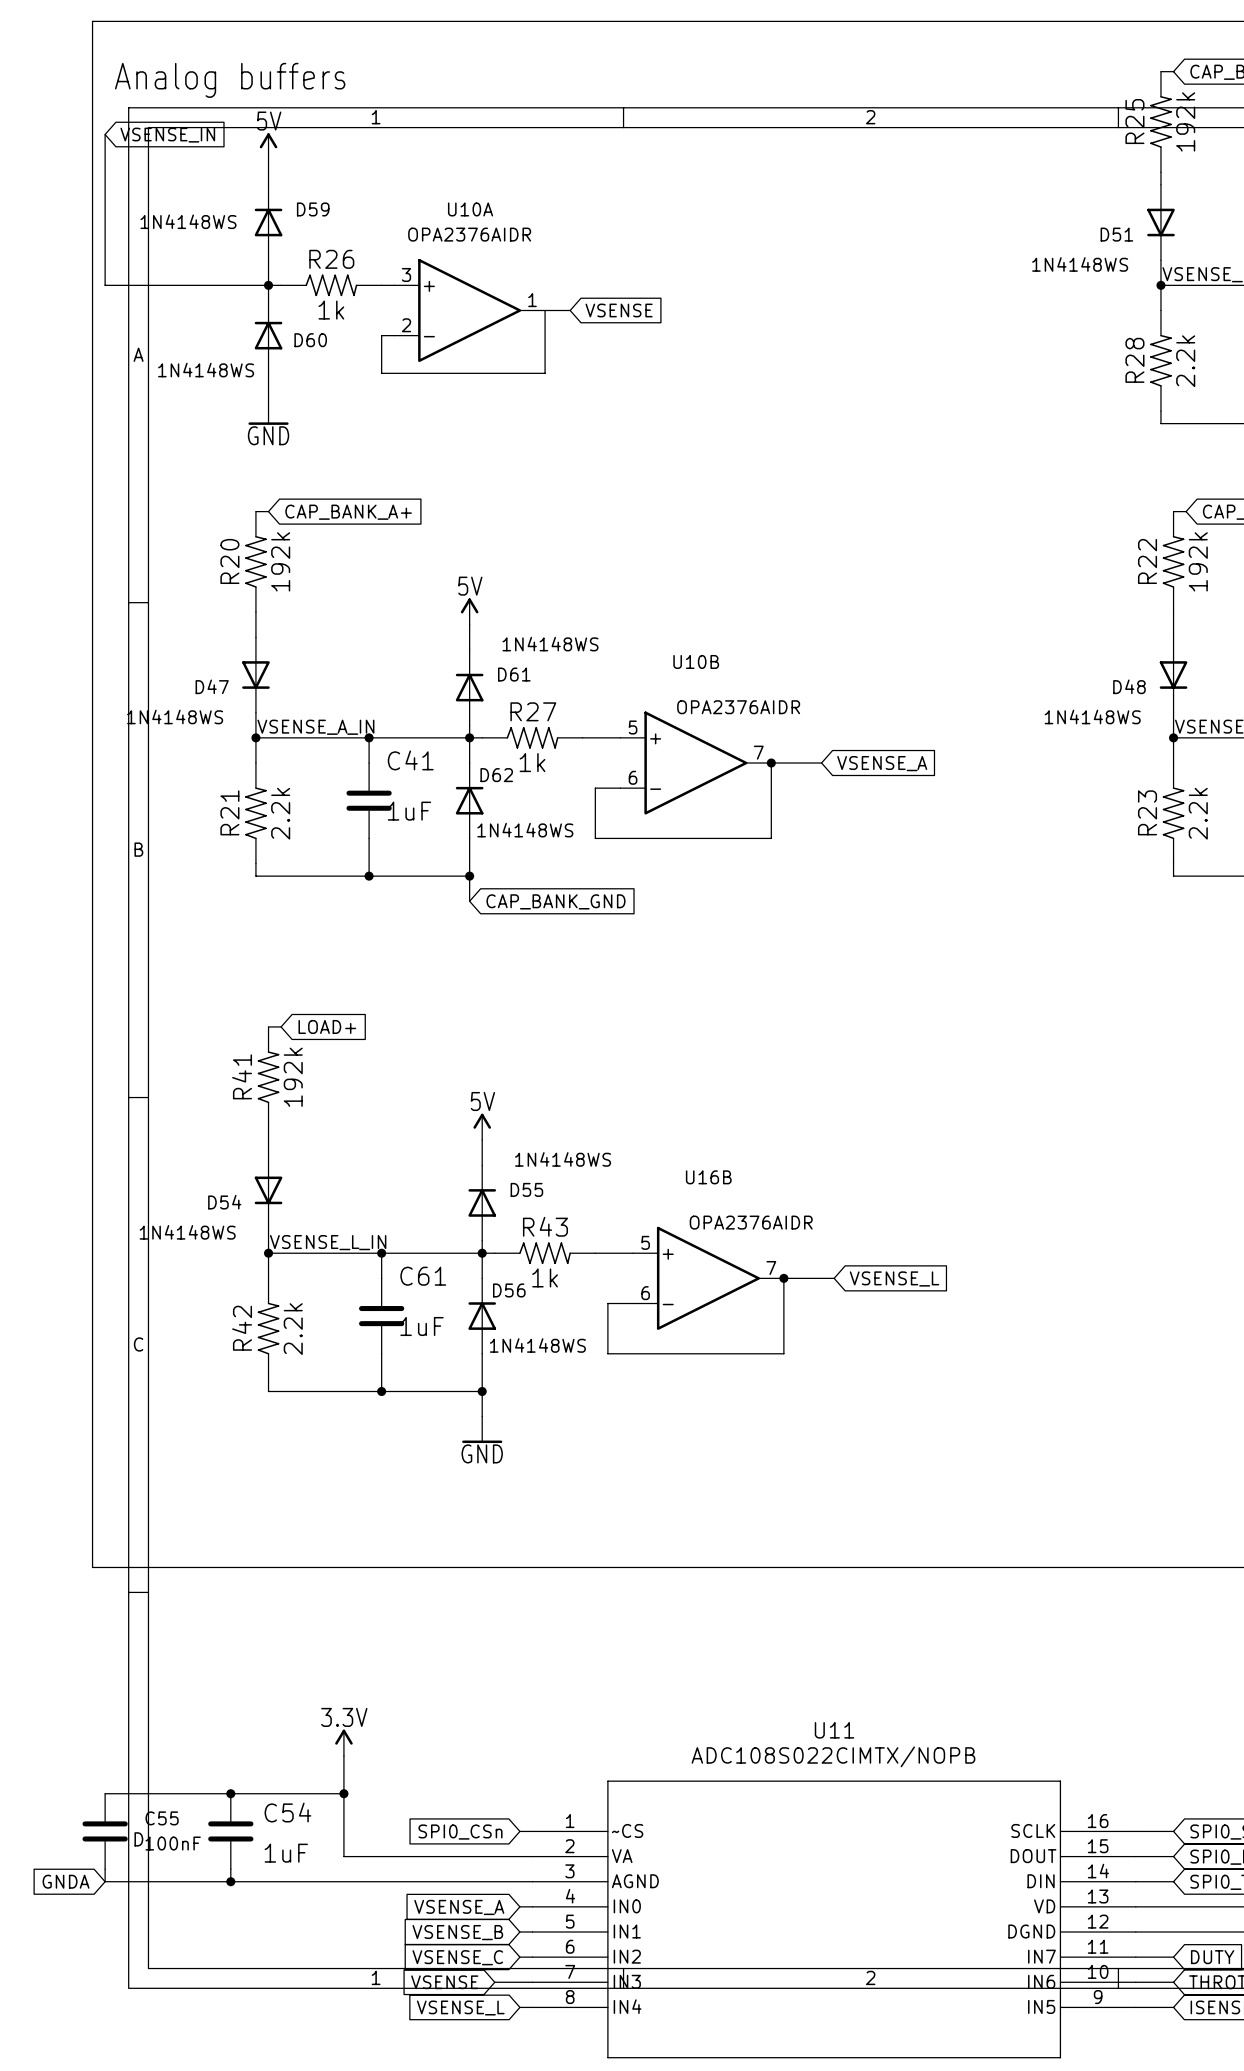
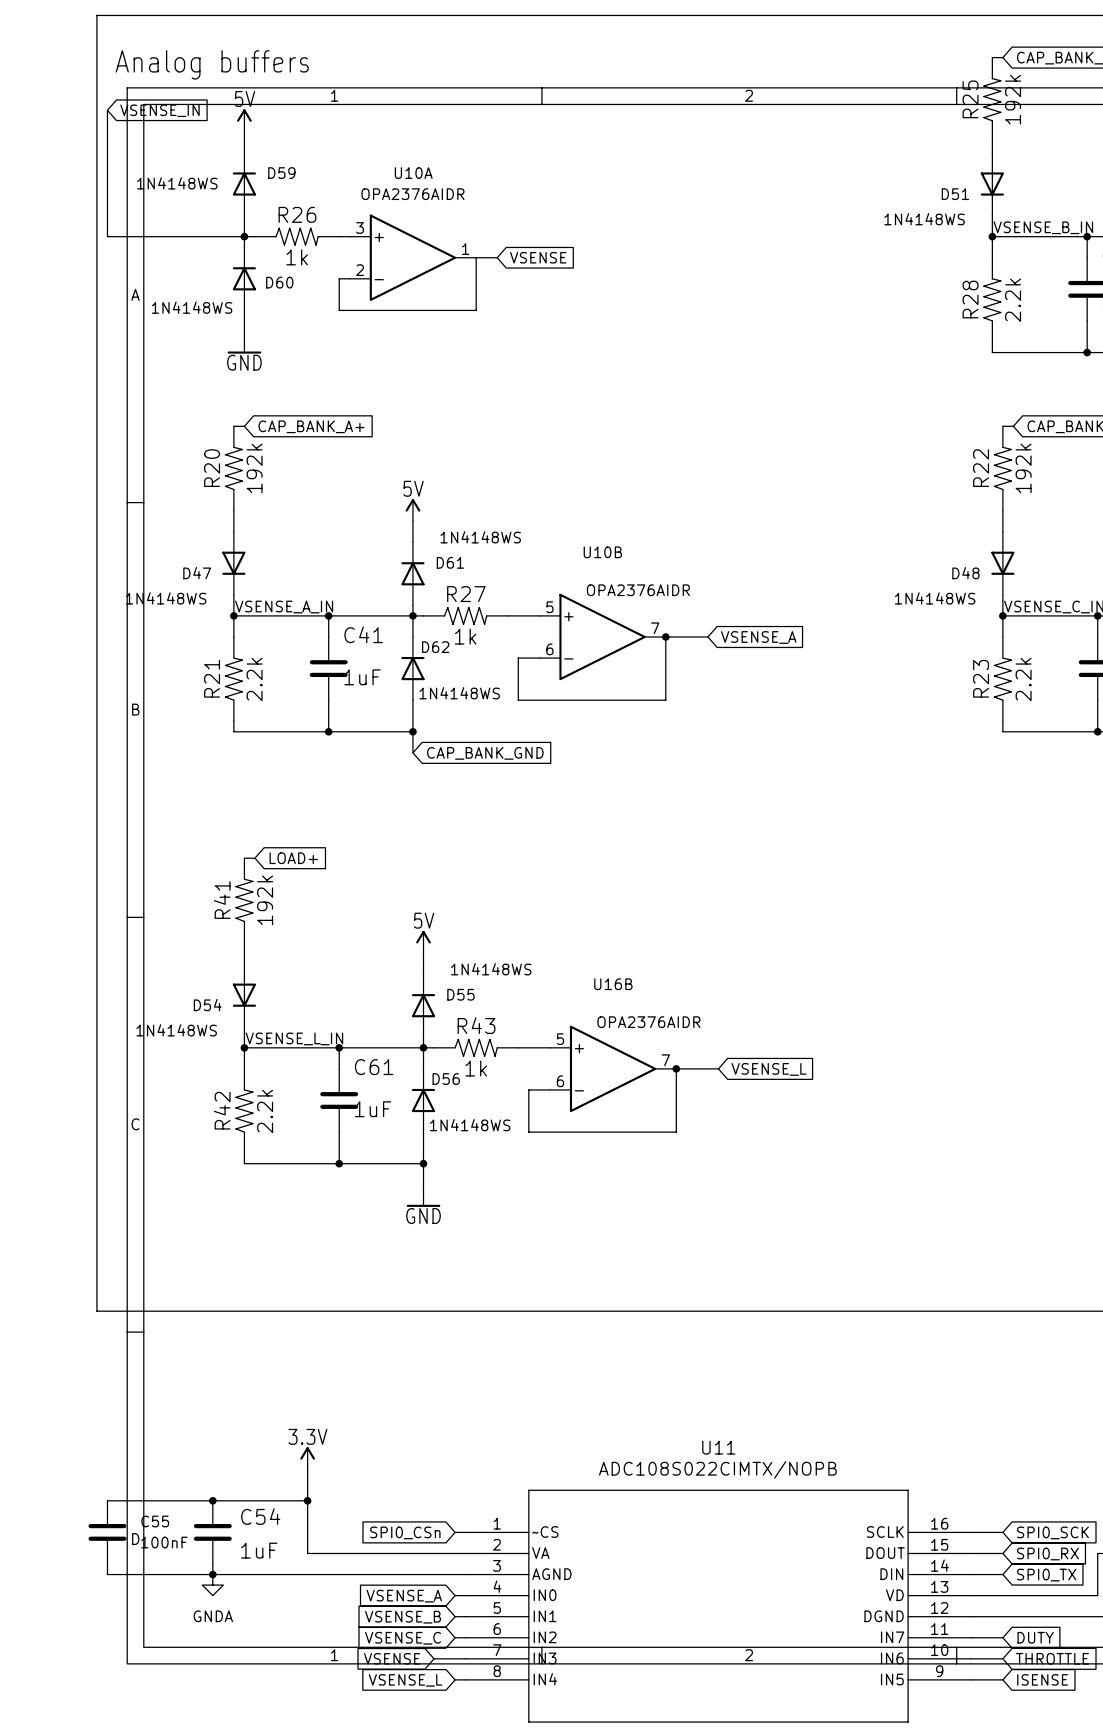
global label: GNDA (66, 1881) -> none
power symbol: none -> GNDA (212, 1585)

